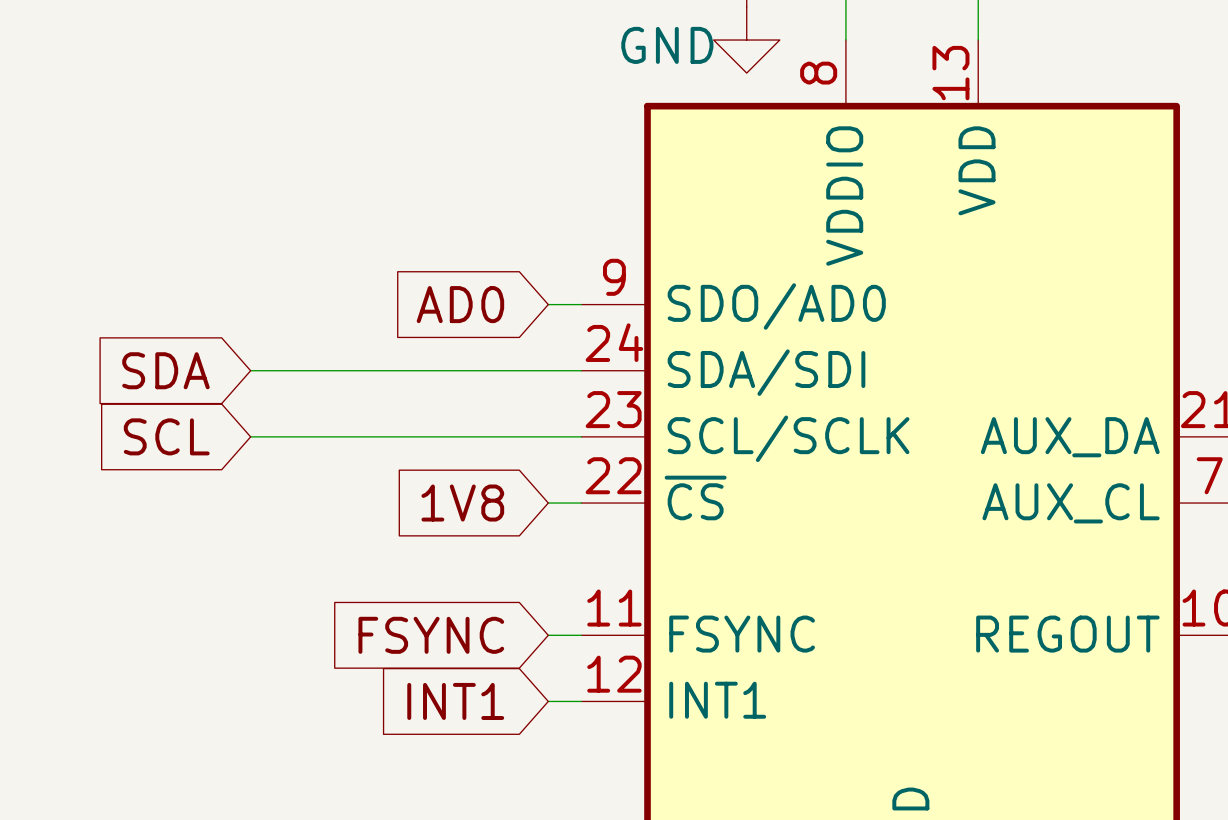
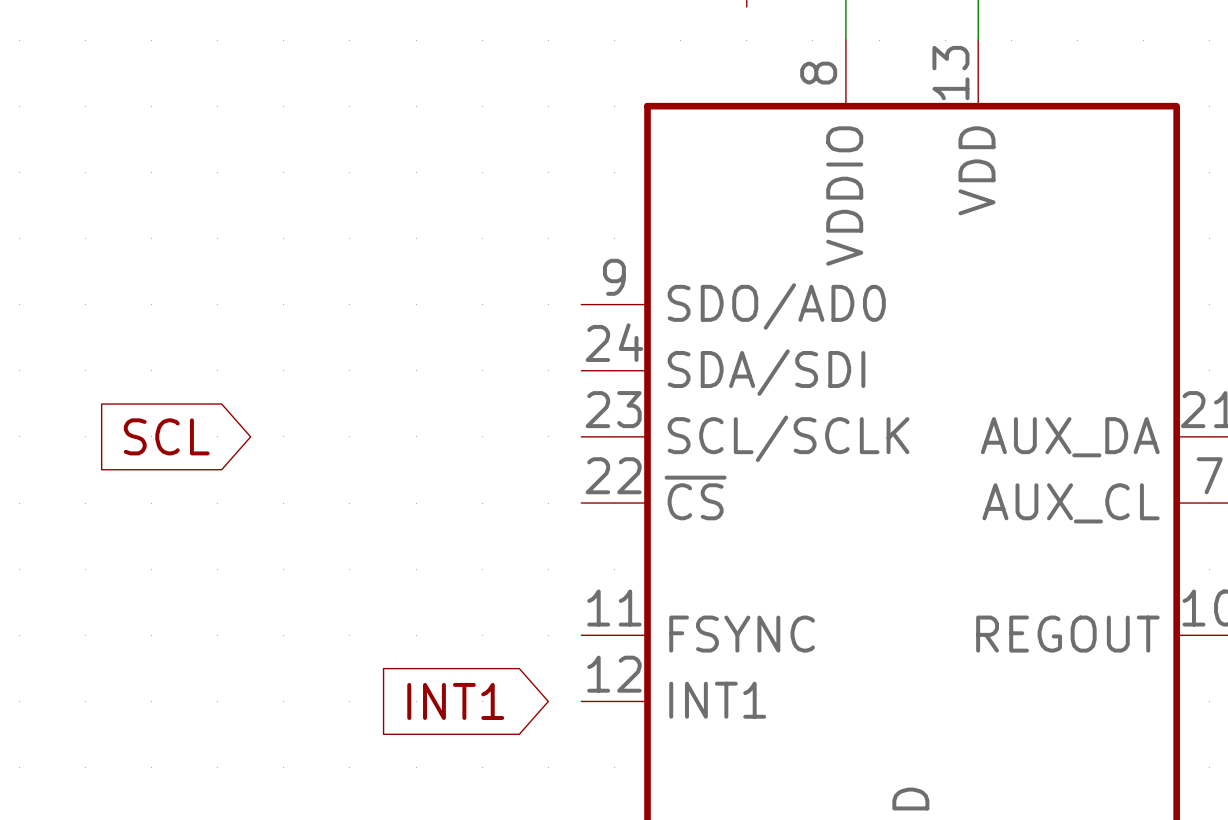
power symbol: GND (746, 40) -> none
global label: AD0 (460, 304) -> none
wire: (548, 304) (581, 304) -> none
global label: SDA (165, 370) -> none
wire: (250, 370) (581, 370) -> none
wire: (250, 436) (581, 436) -> none
global label: 1V8 (462, 503) -> none
wire: (548, 503) (581, 503) -> none
global label: FSYNC (431, 635) -> none
wire: (548, 635) (581, 635) -> none
wire: (548, 701) (581, 701) -> none

